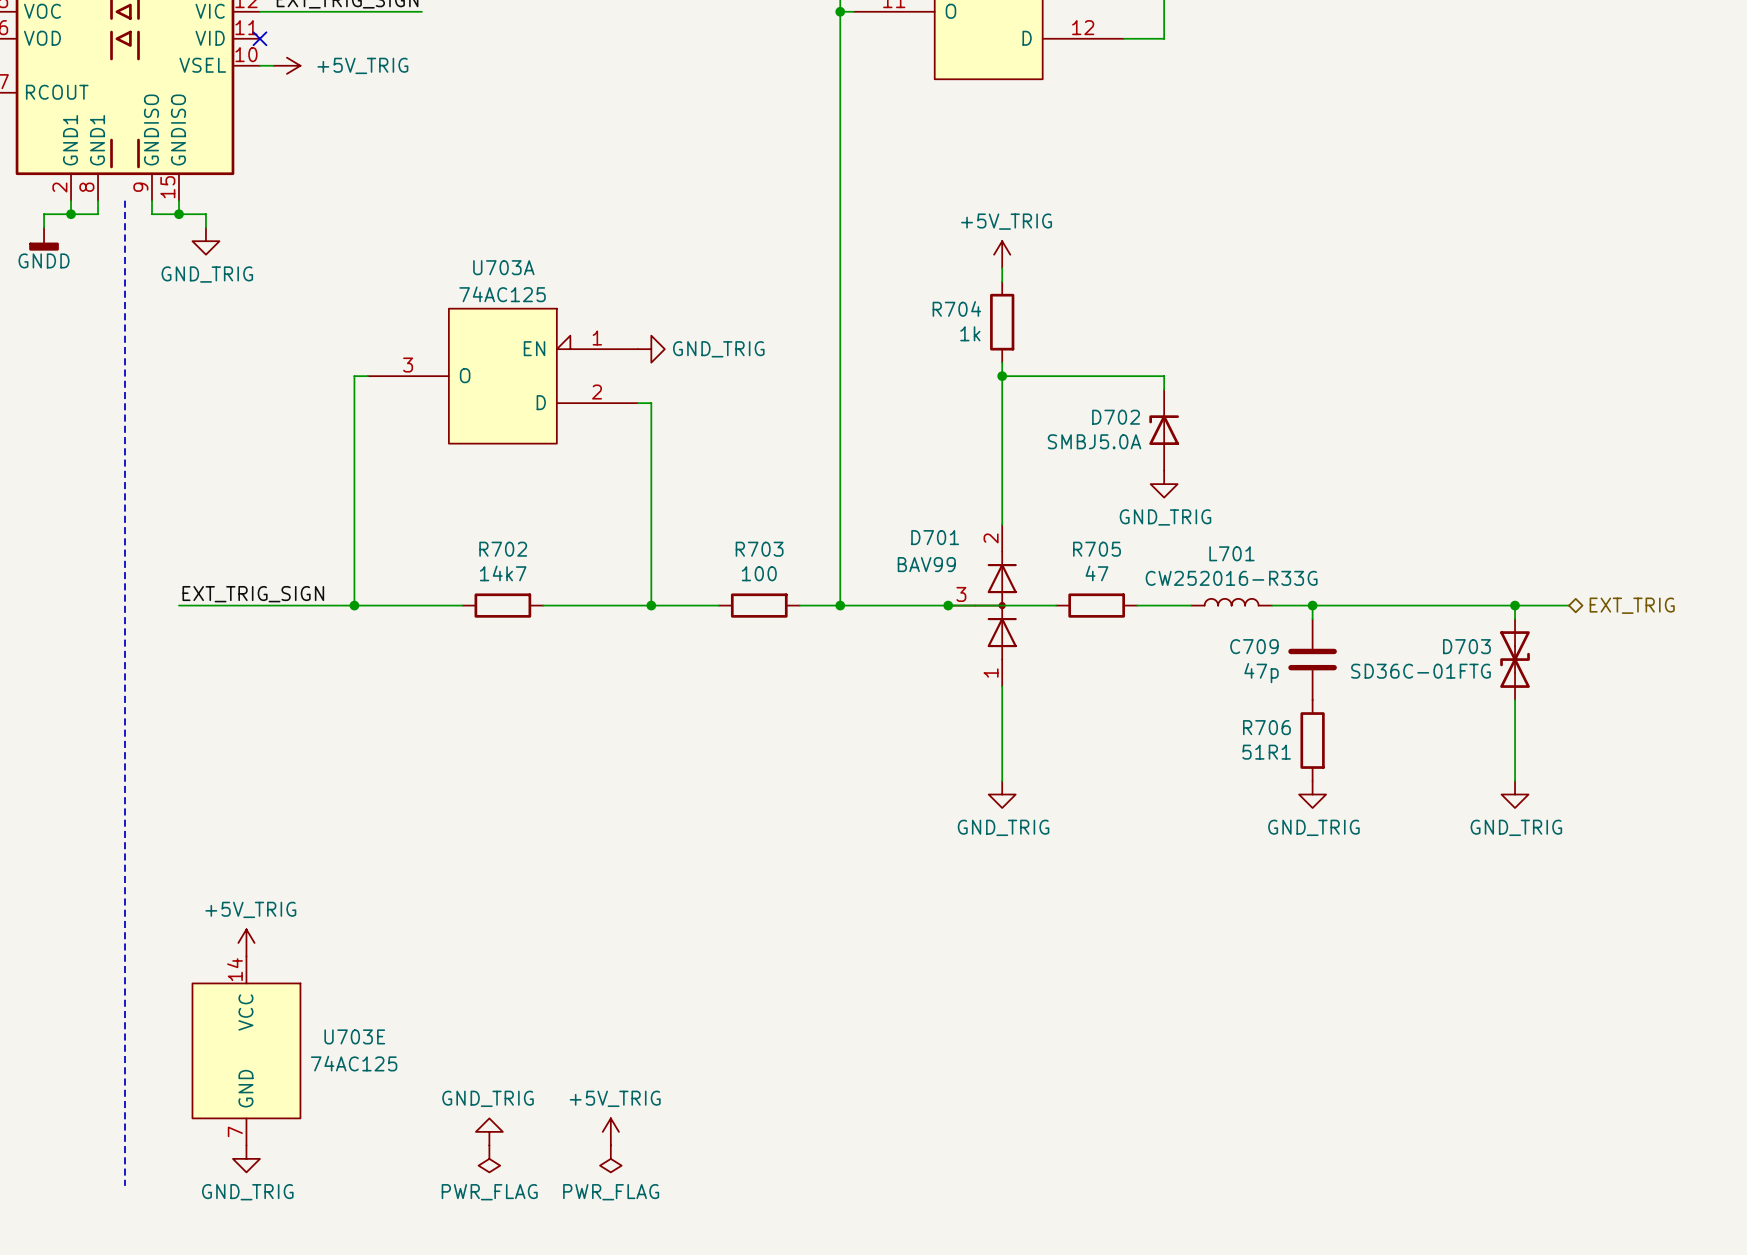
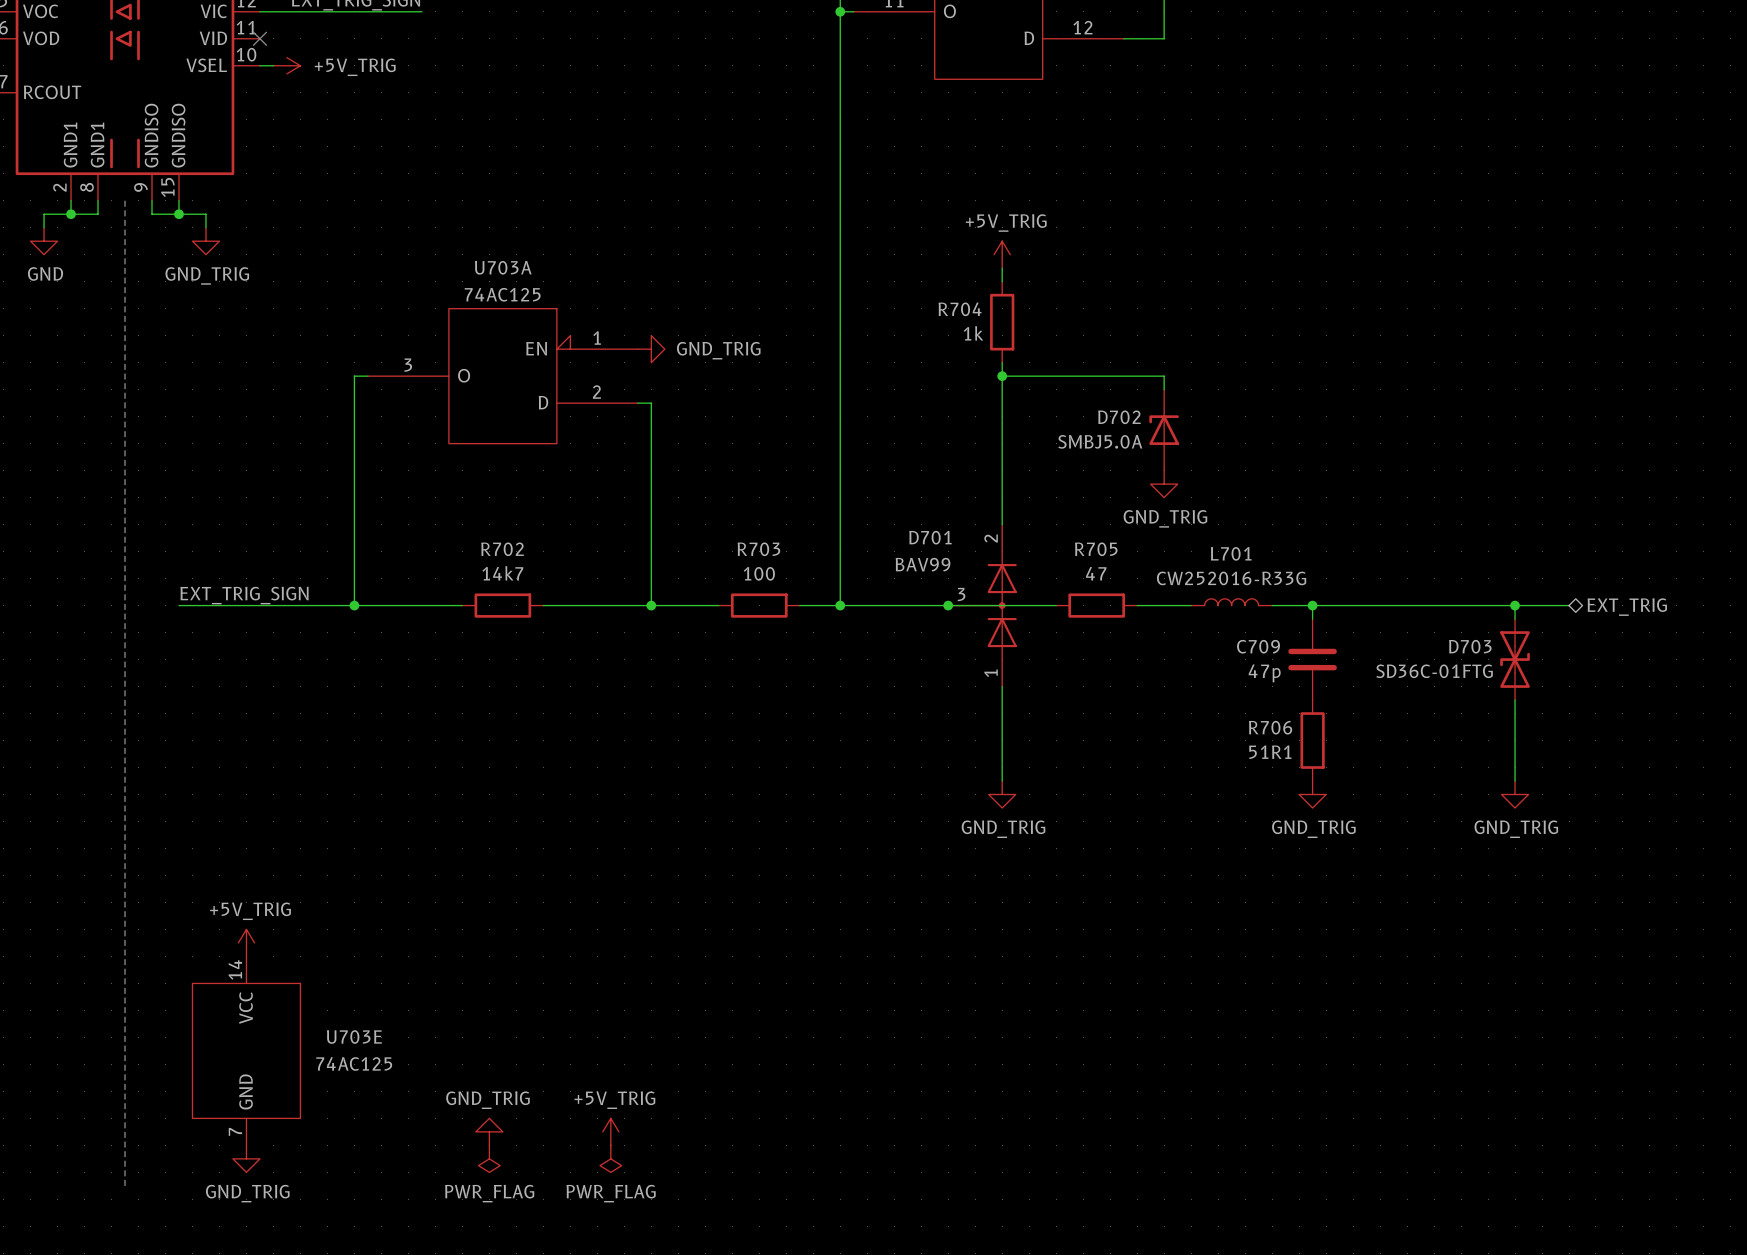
power symbol: GNDD (44, 239) -> GND (44, 241)

